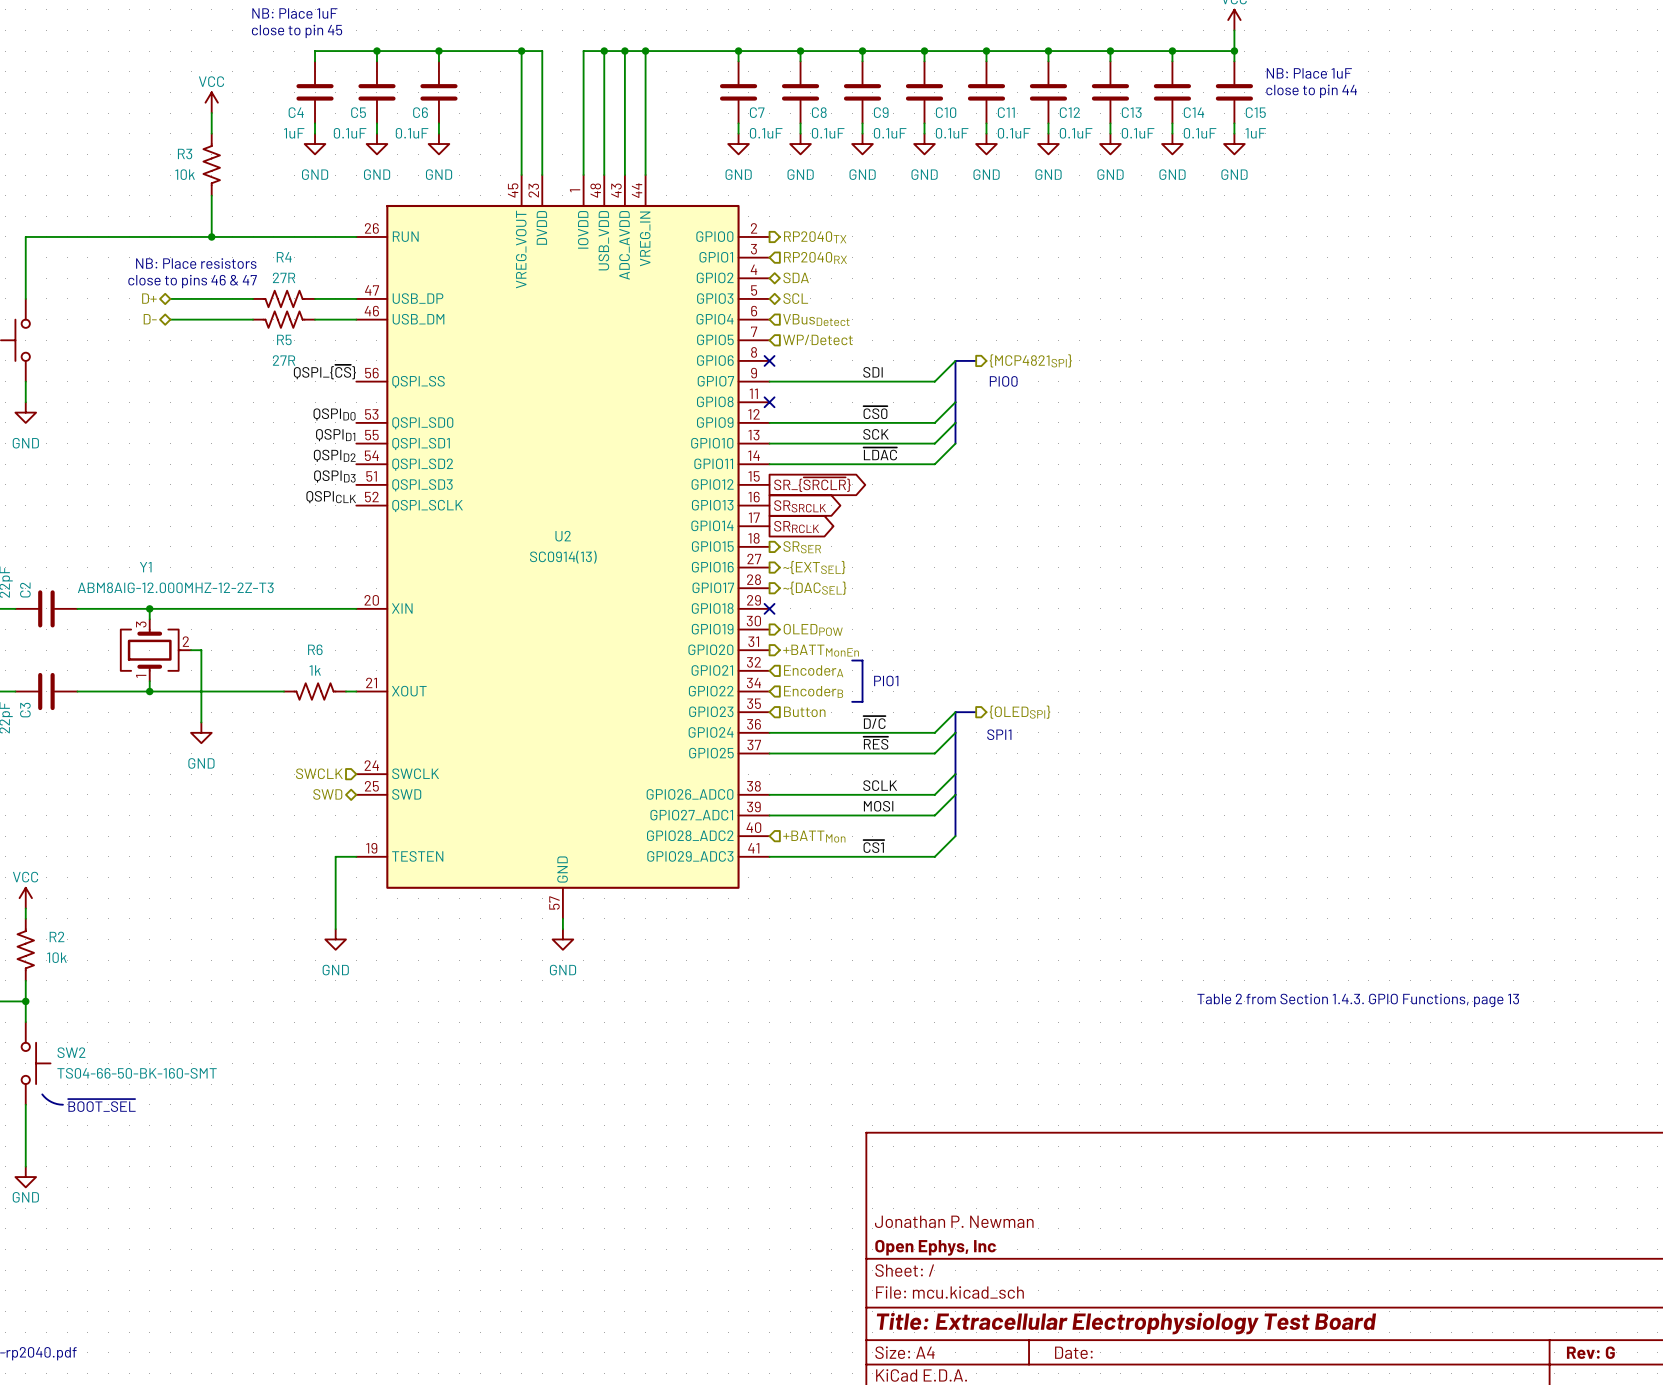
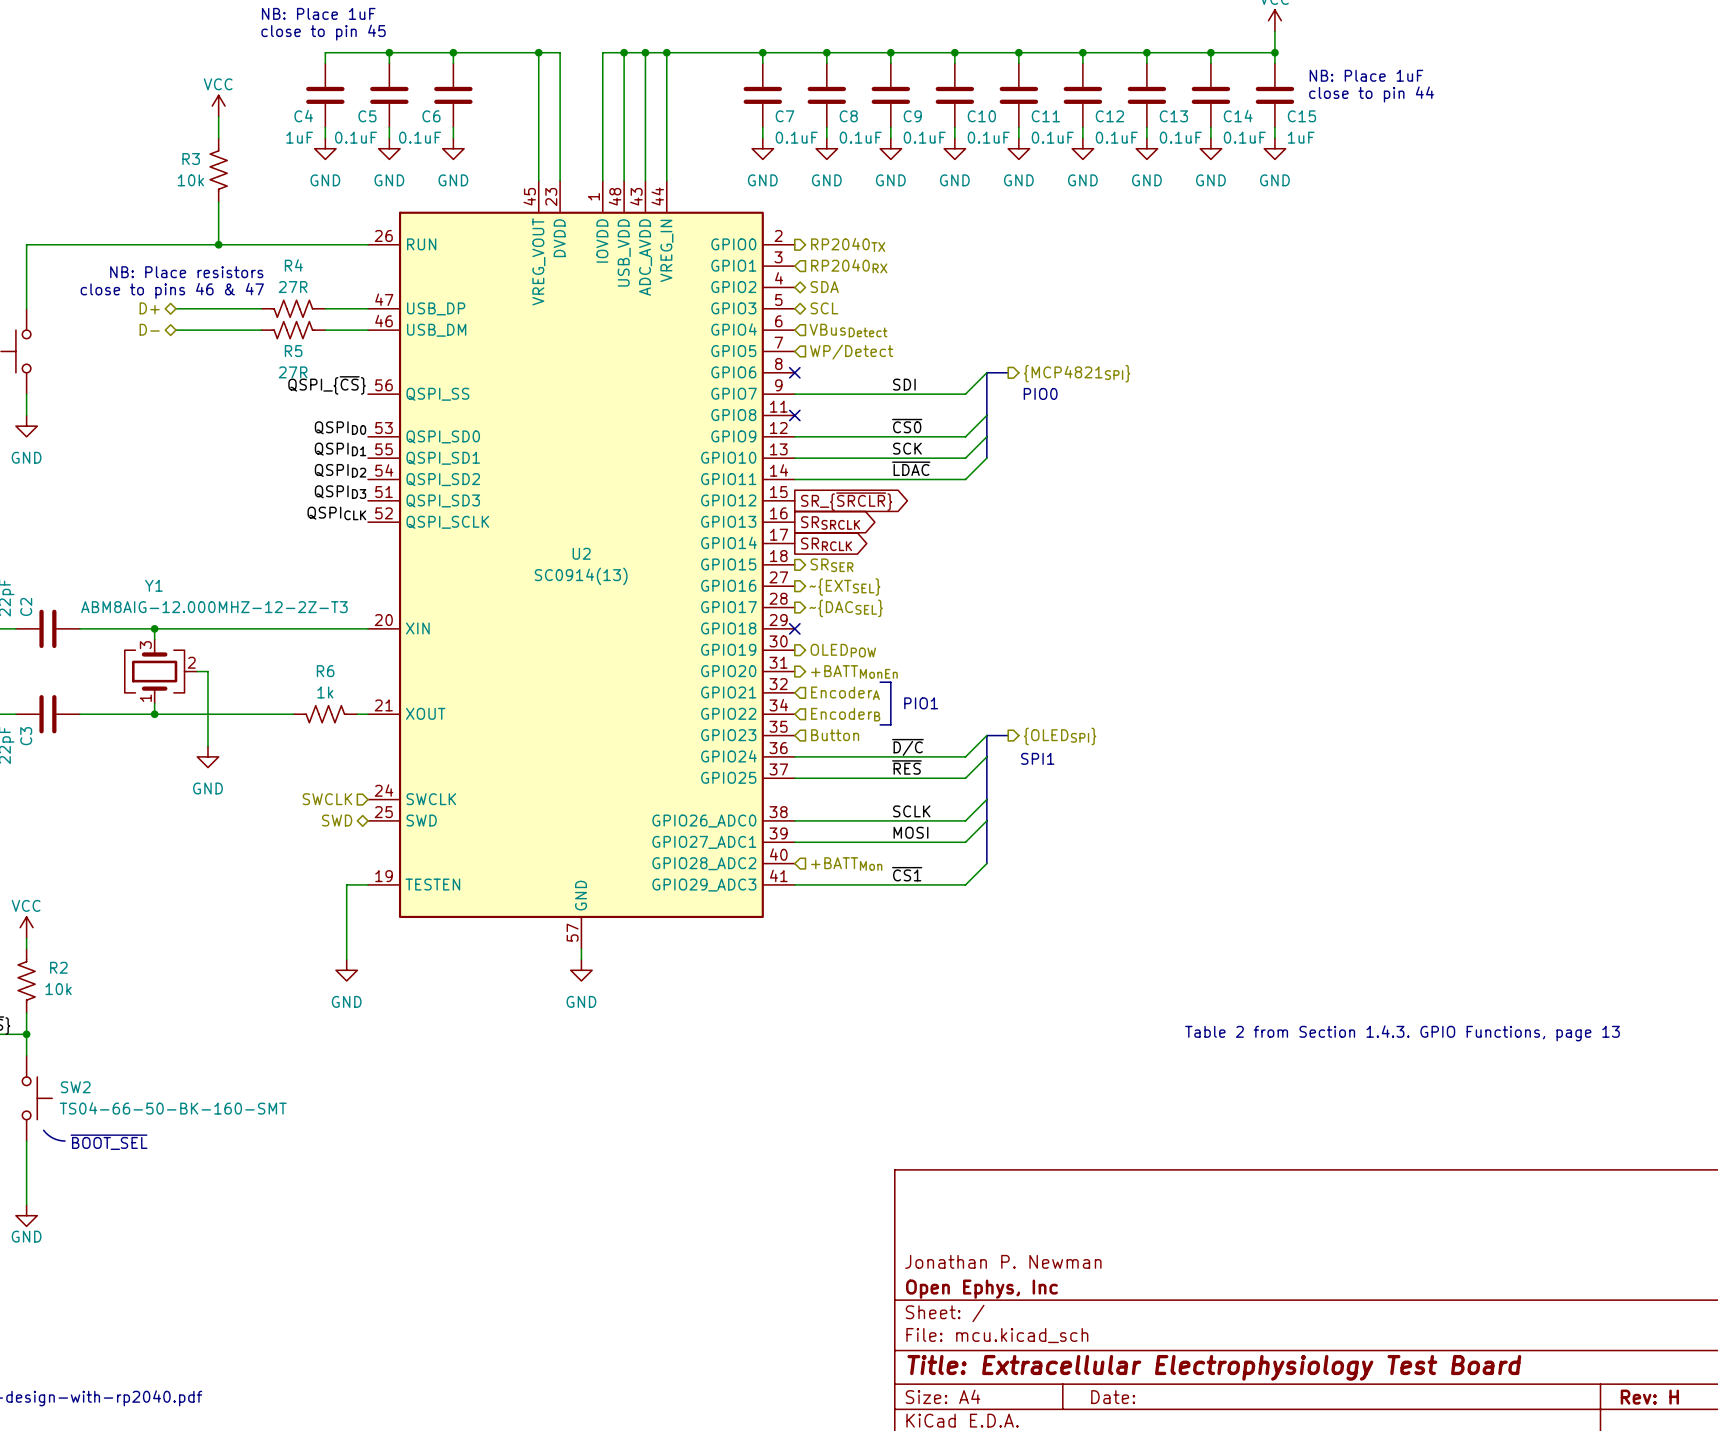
title block: Rev: G (1590, 1352) -> Rev: H (1649, 1397)

